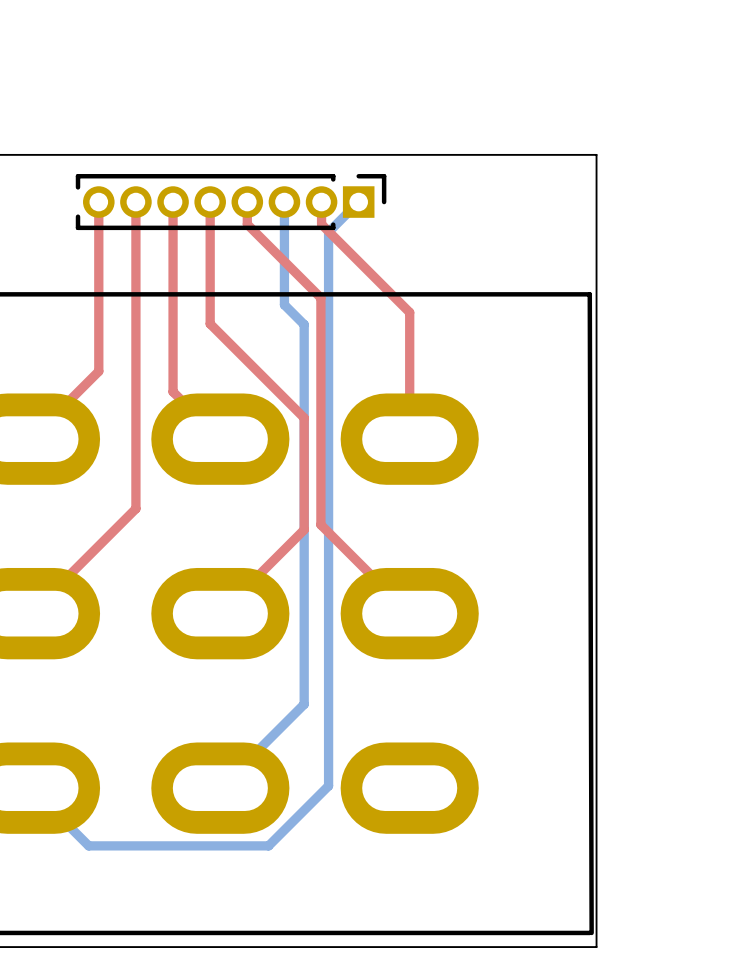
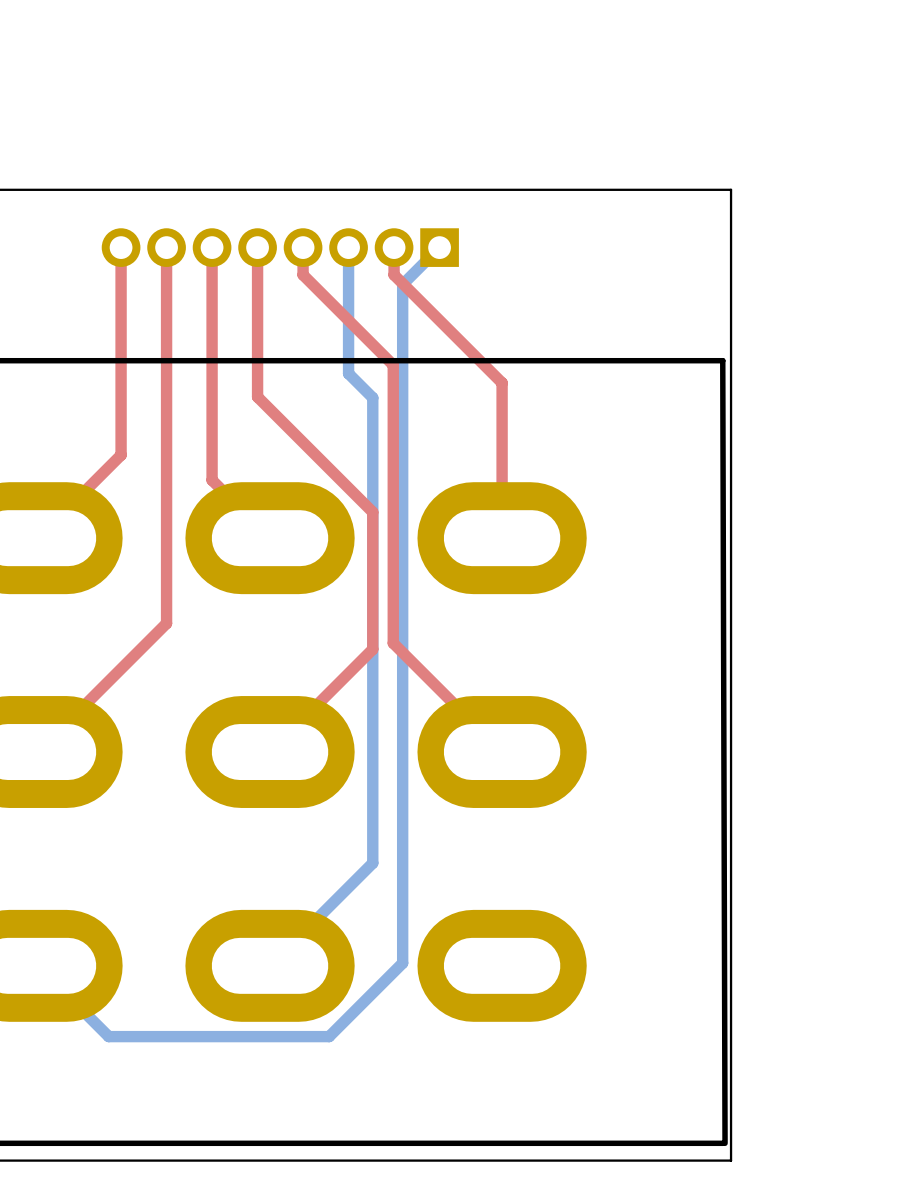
part side: top (231, 202) -> bottom (280, 247)

